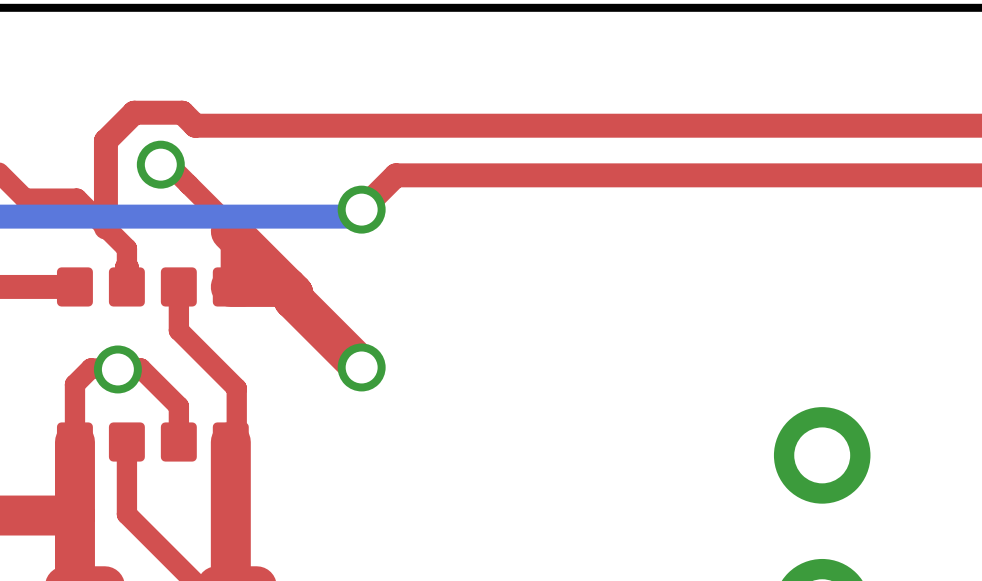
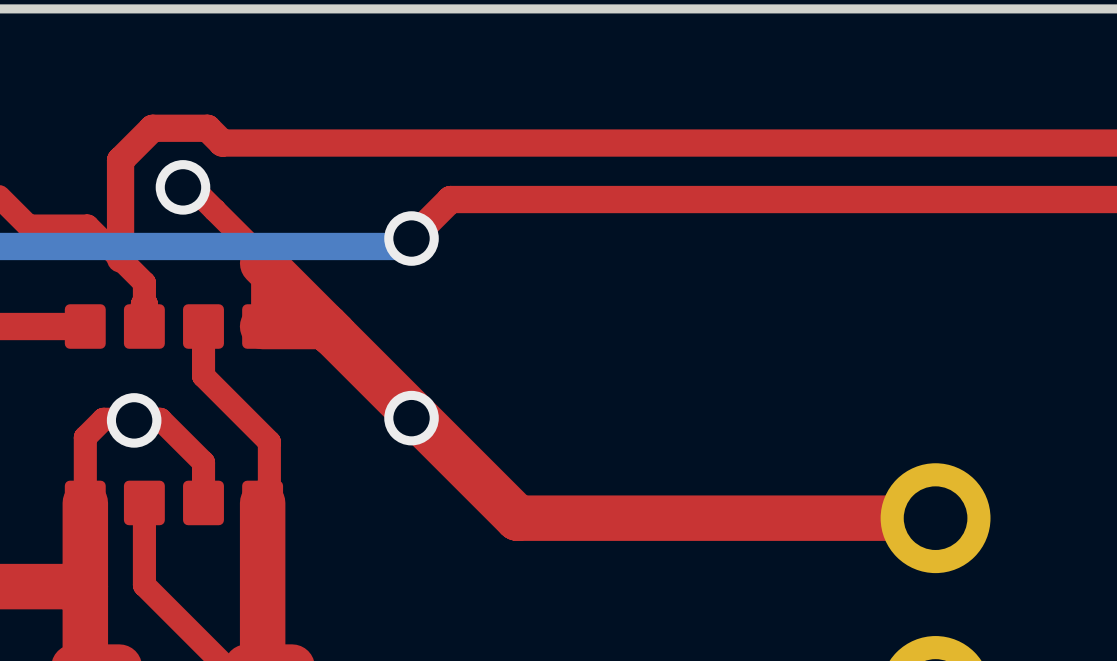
top track: (293, 293) (293, 299) (361, 367) -> (333, 334) (517, 518) (935, 518)

